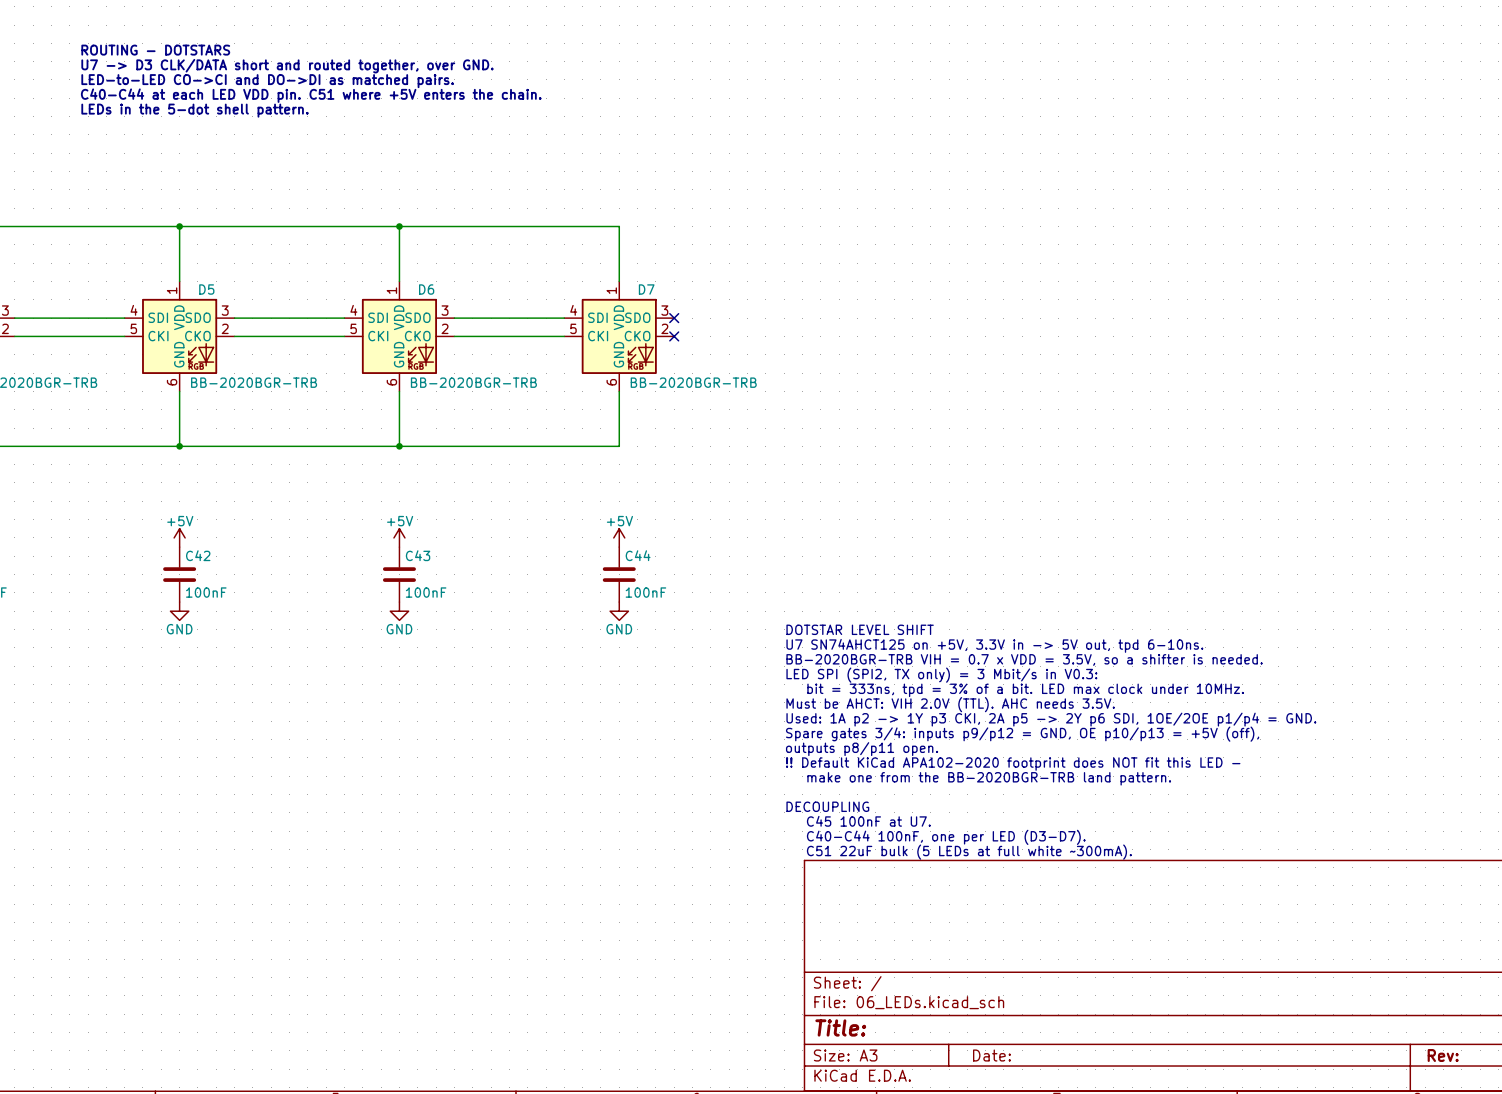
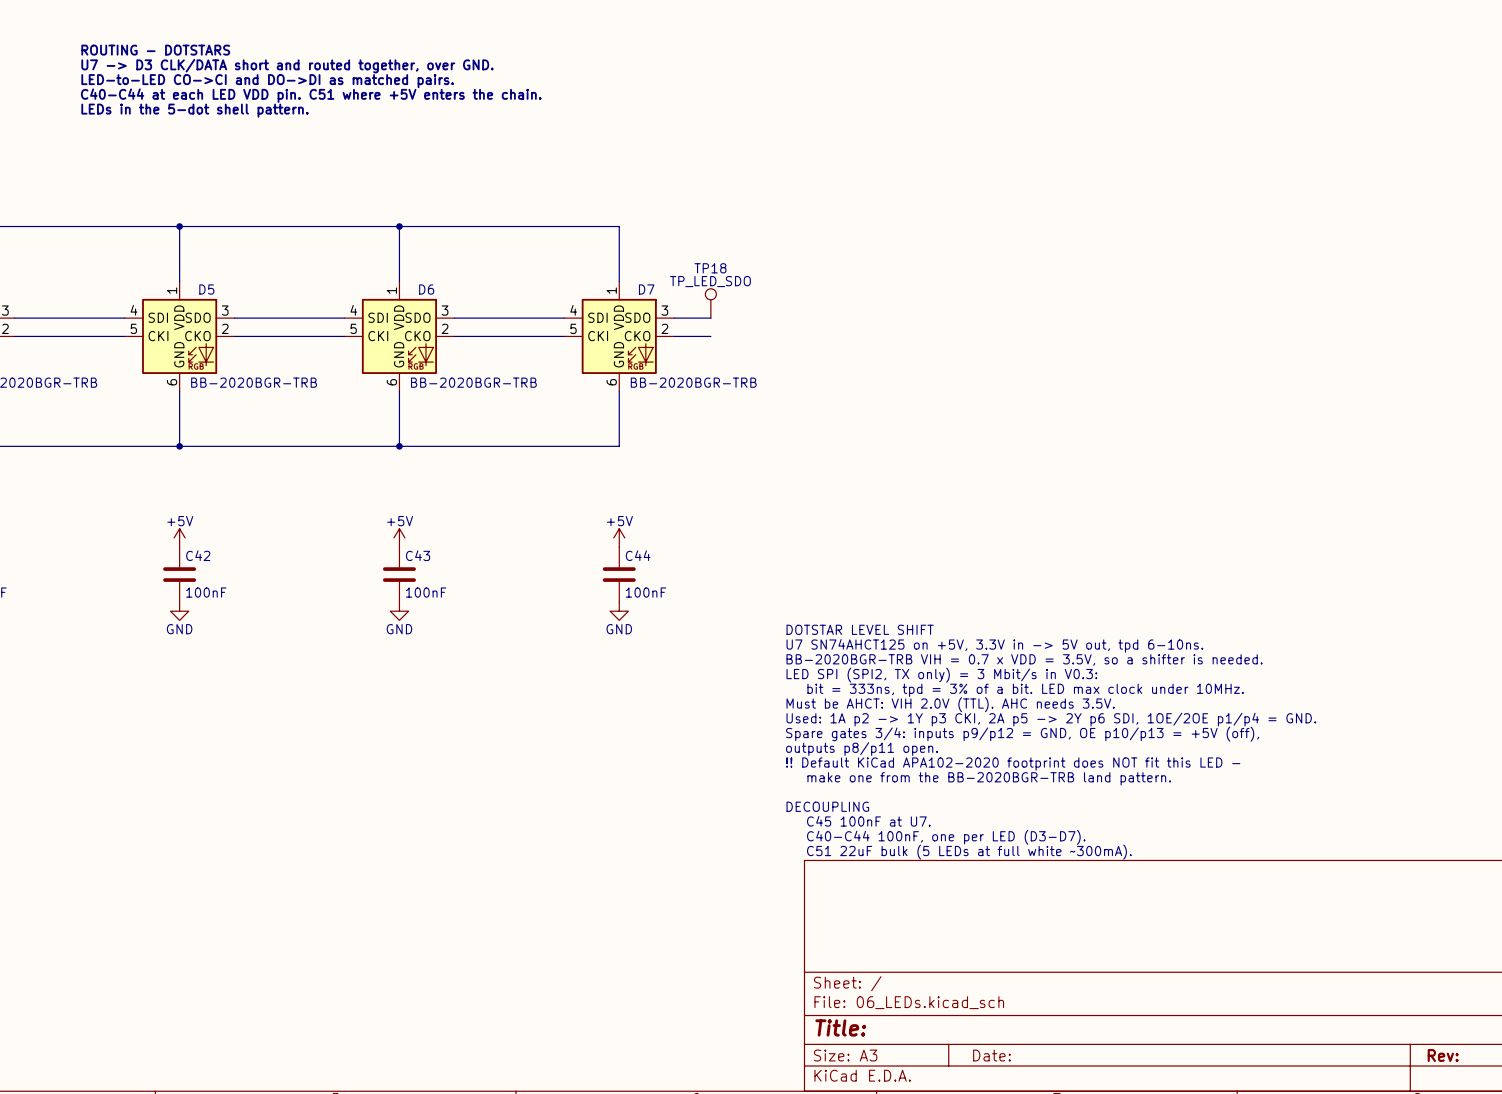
TP18: none -> TP_LED_SDO (710, 303)
wire: none -> (674, 318) (710, 318)
no-connect mark: (674, 318) -> none
wire: none -> (674, 336) (710, 336)
no-connect mark: (674, 336) -> none

